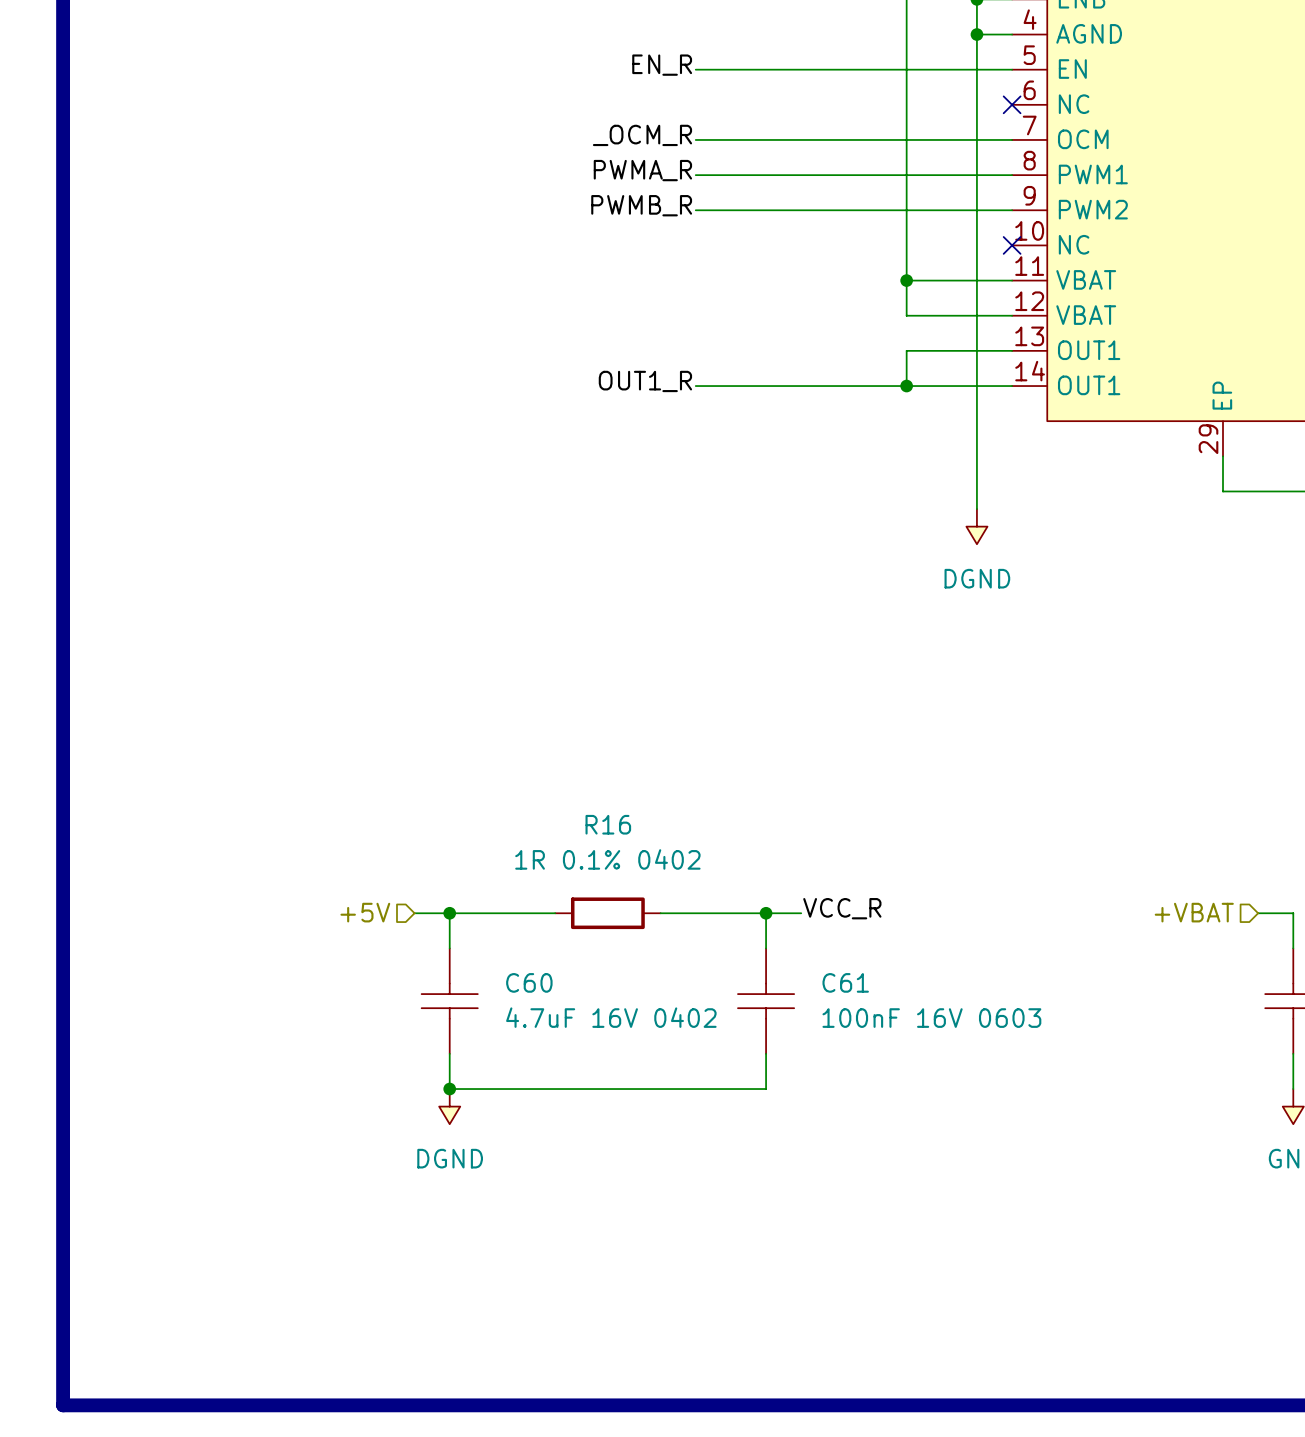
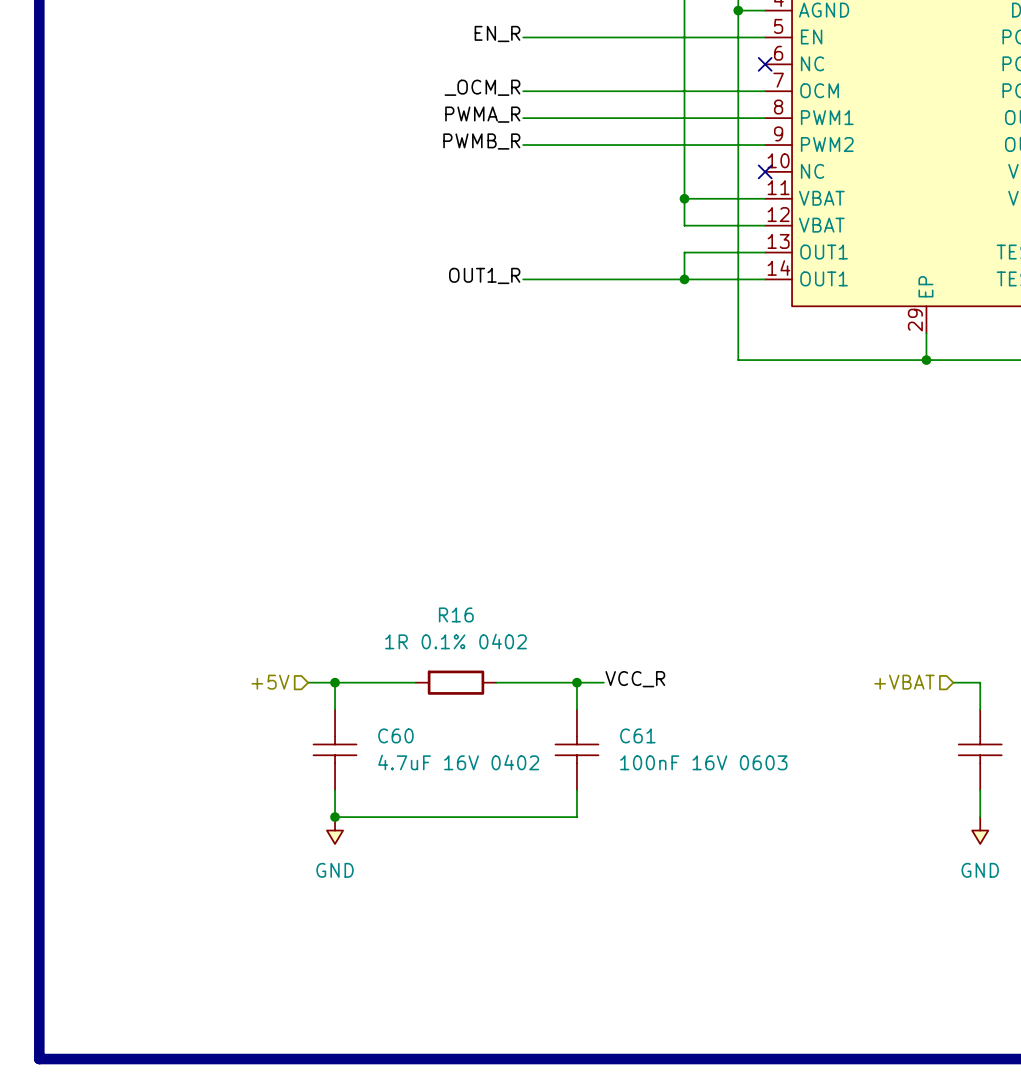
wire: (976, 491) (976, 509) -> (738, 360) (926, 360)
junction: none -> (926, 360)
power symbol: DGND (976, 526) -> none
power symbol: DGND (449, 1106) -> GND (335, 830)

